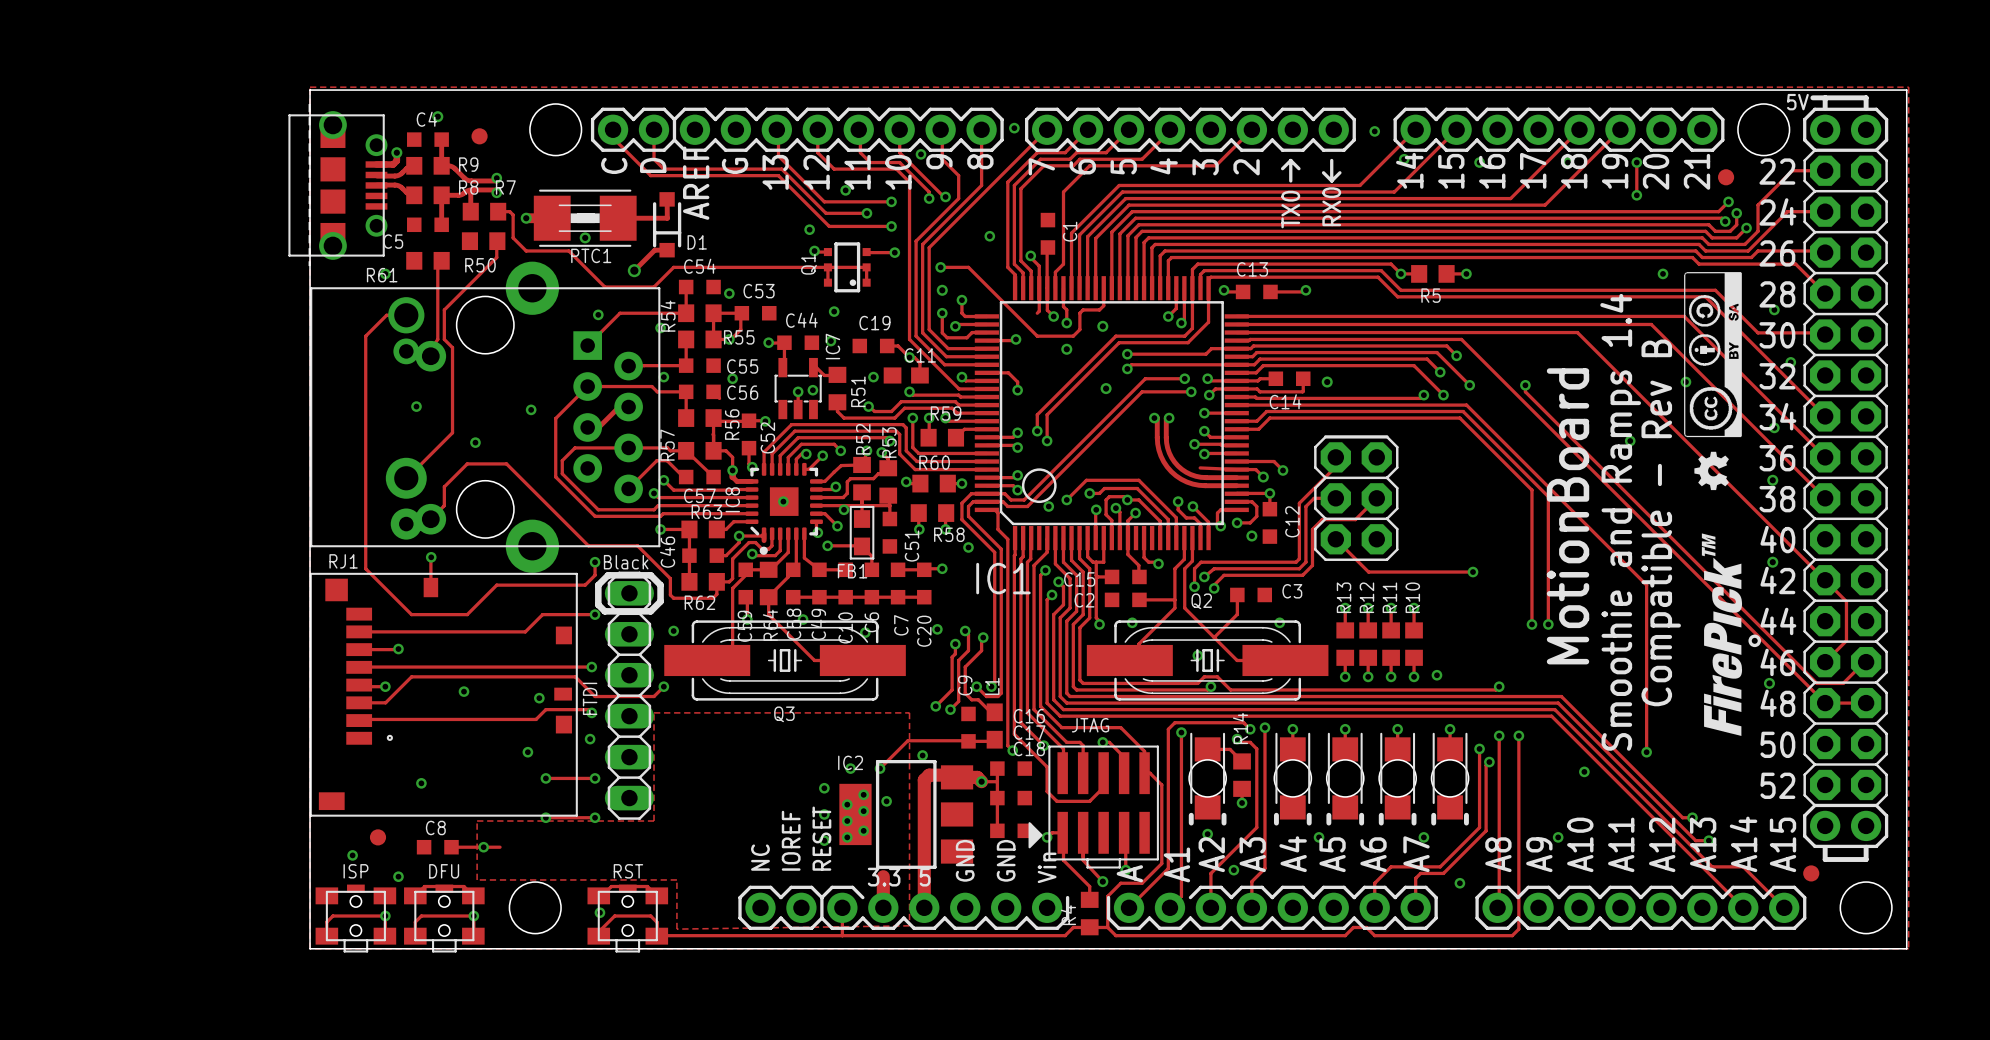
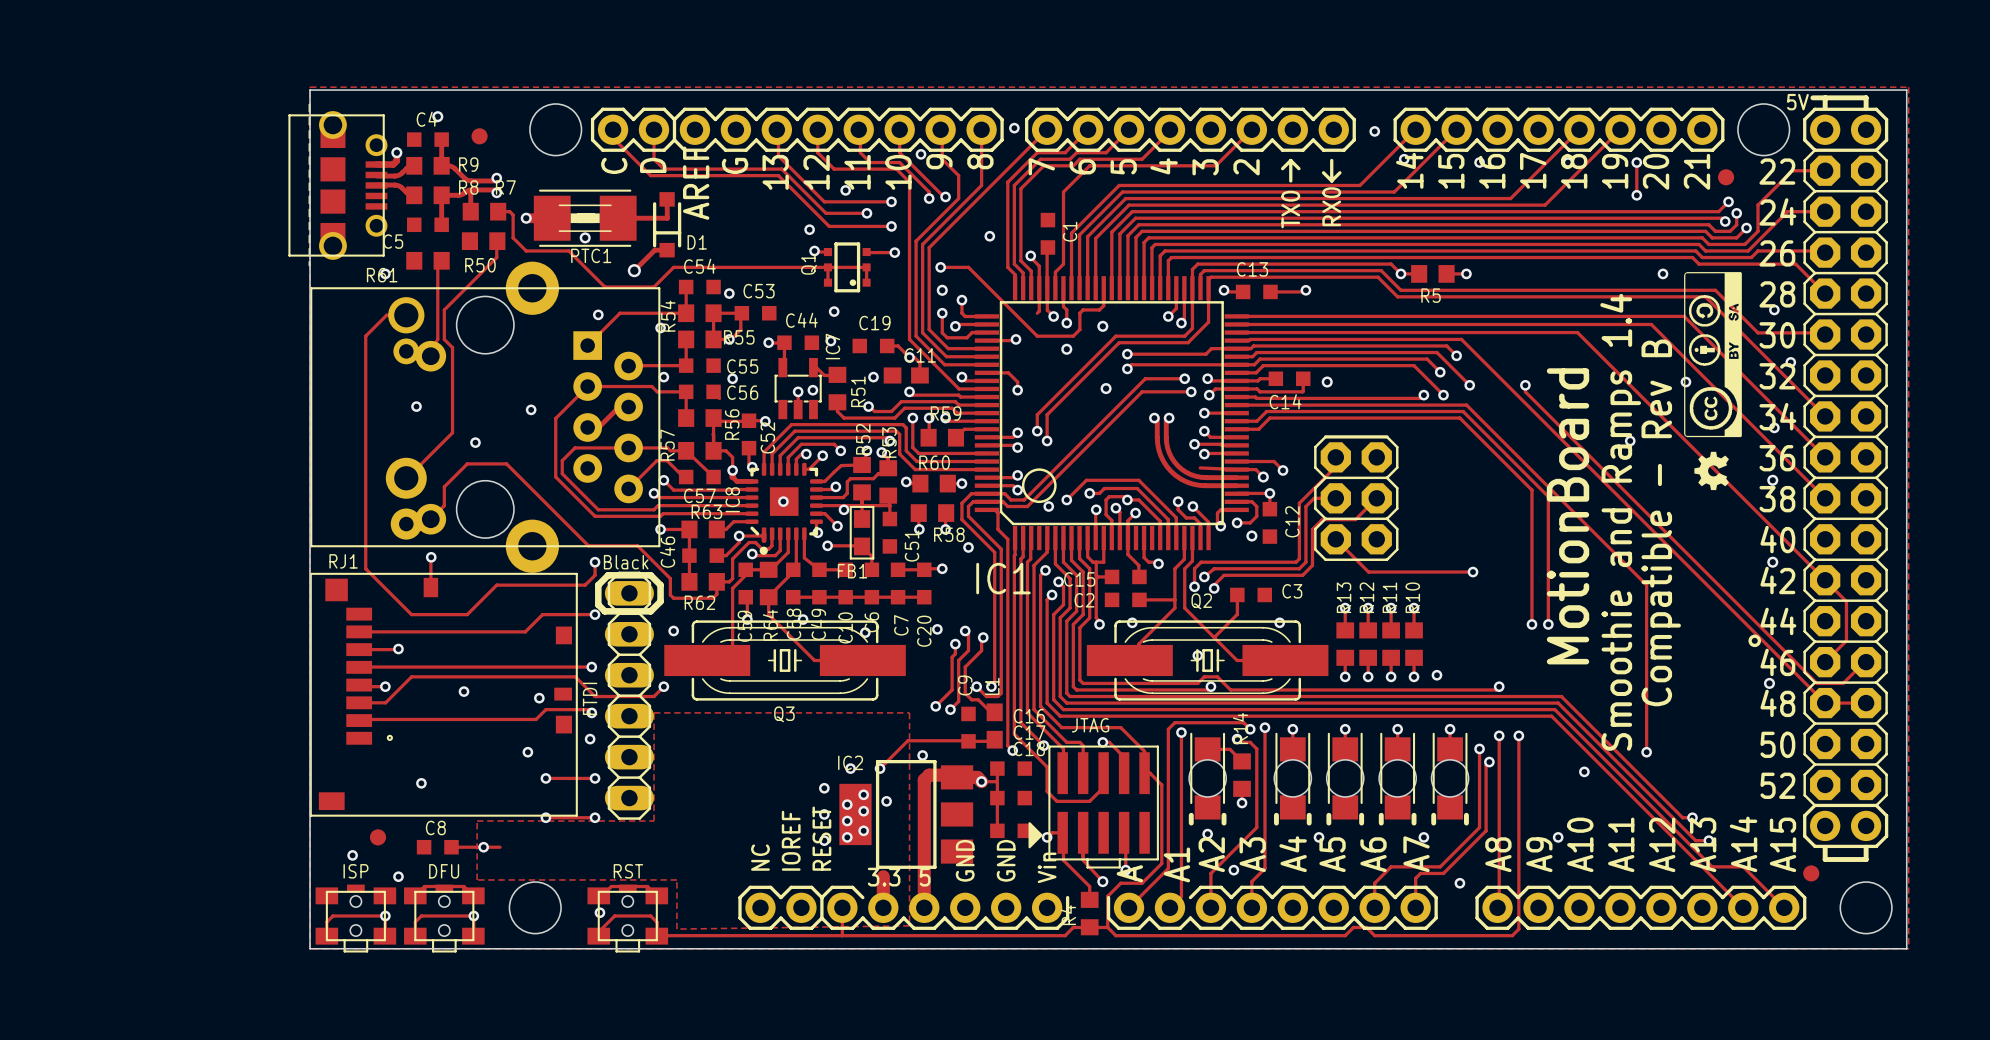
drawing: [1701, 533, 1743, 736] -> none

